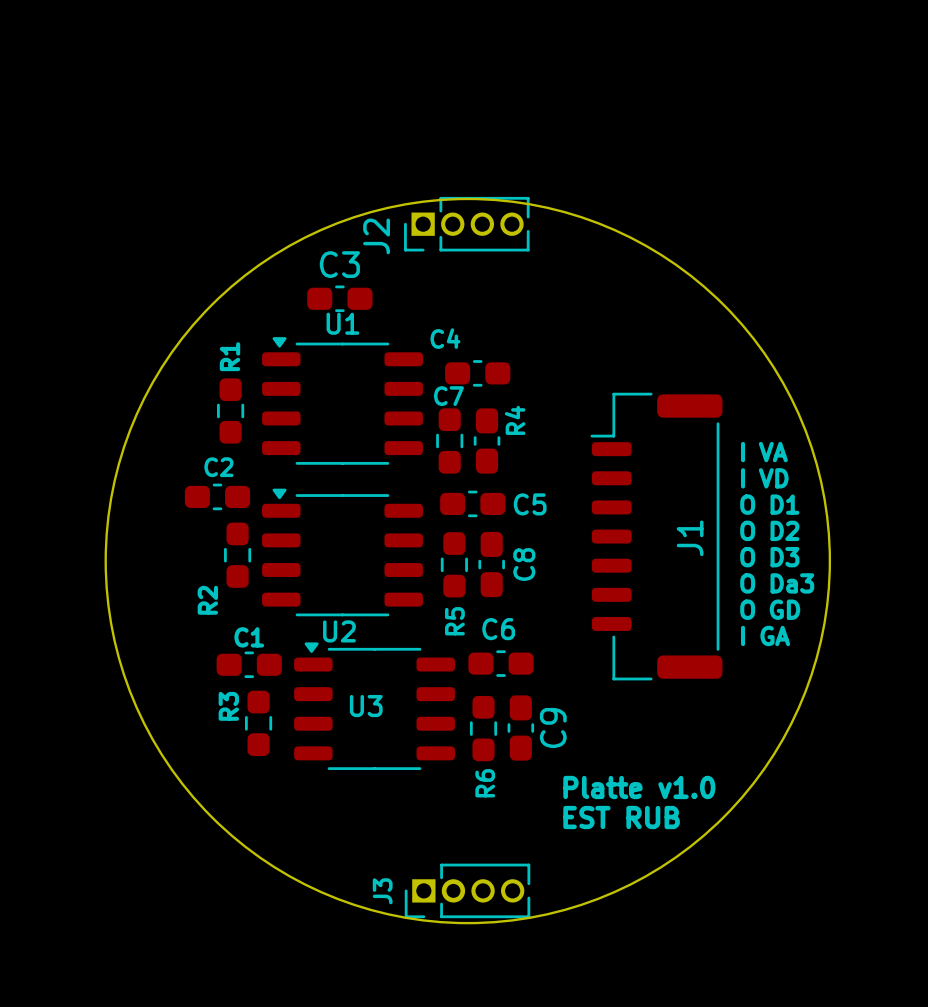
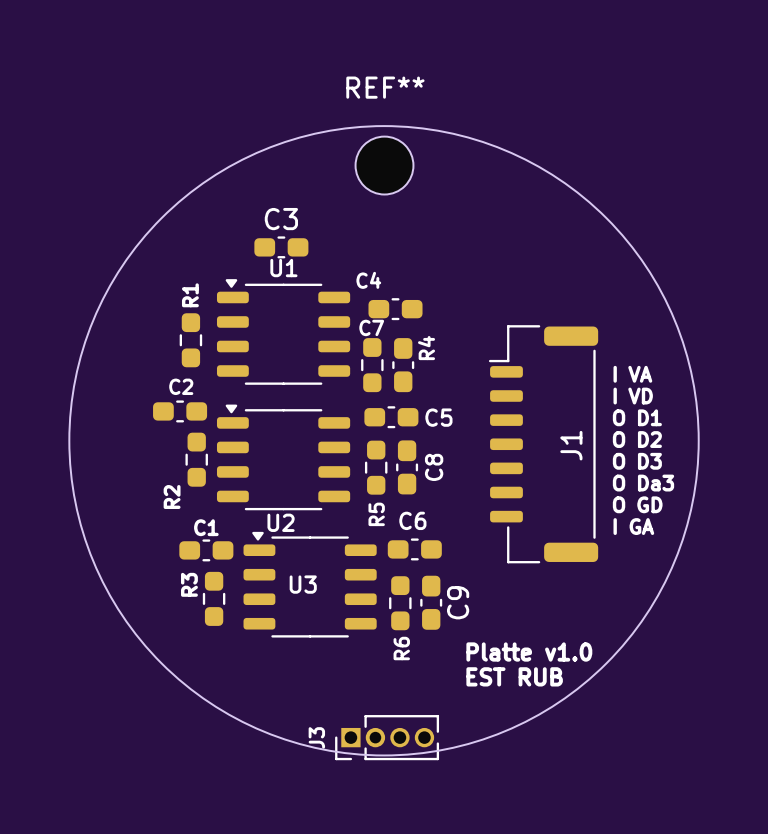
round board edge: none -> [68, 125, 700, 757]
round board edge: [104, 197, 832, 925] -> none
REF**: none -> (384, 165)
J2: (466, 224) -> none

